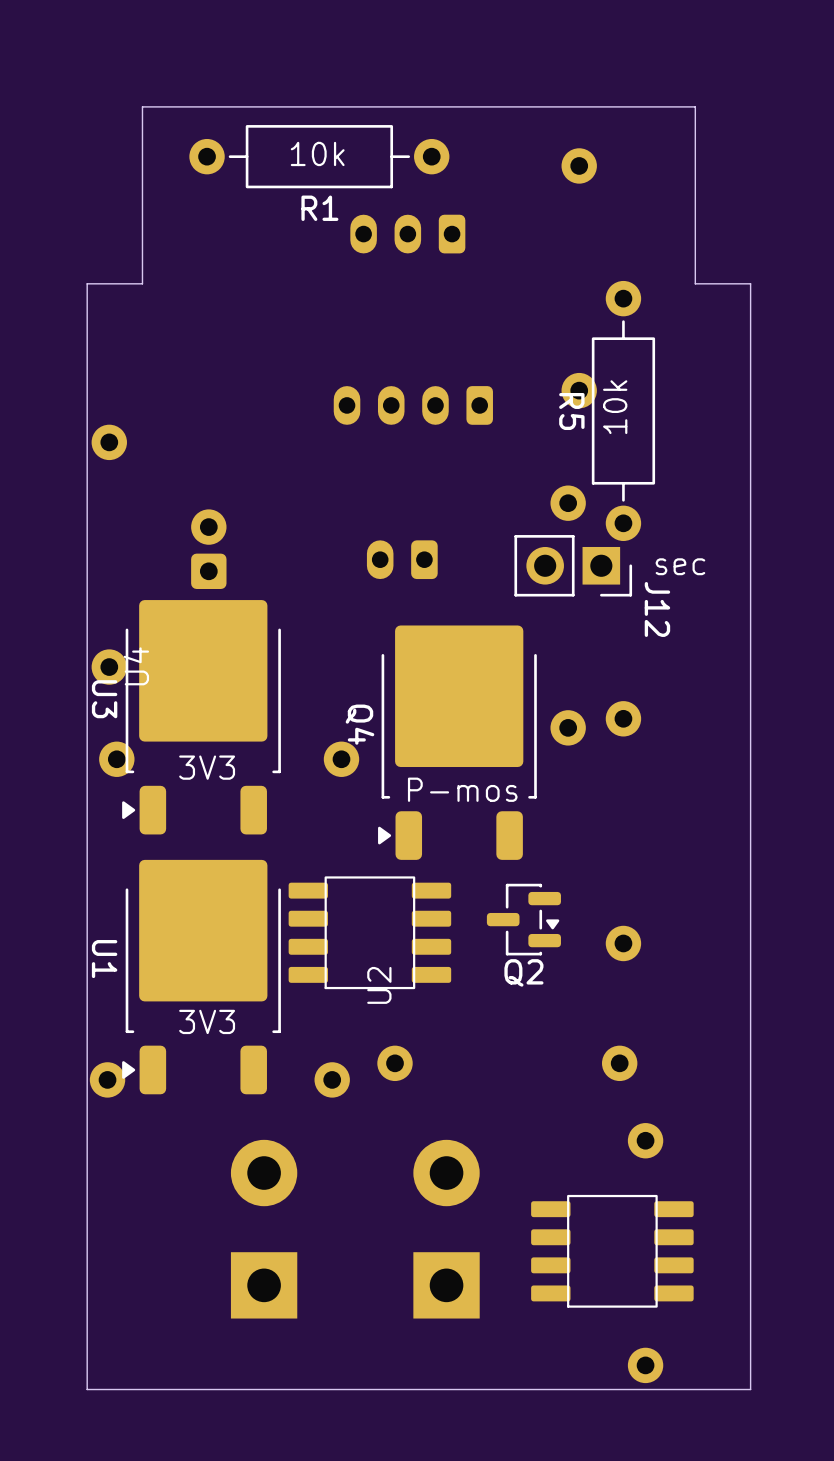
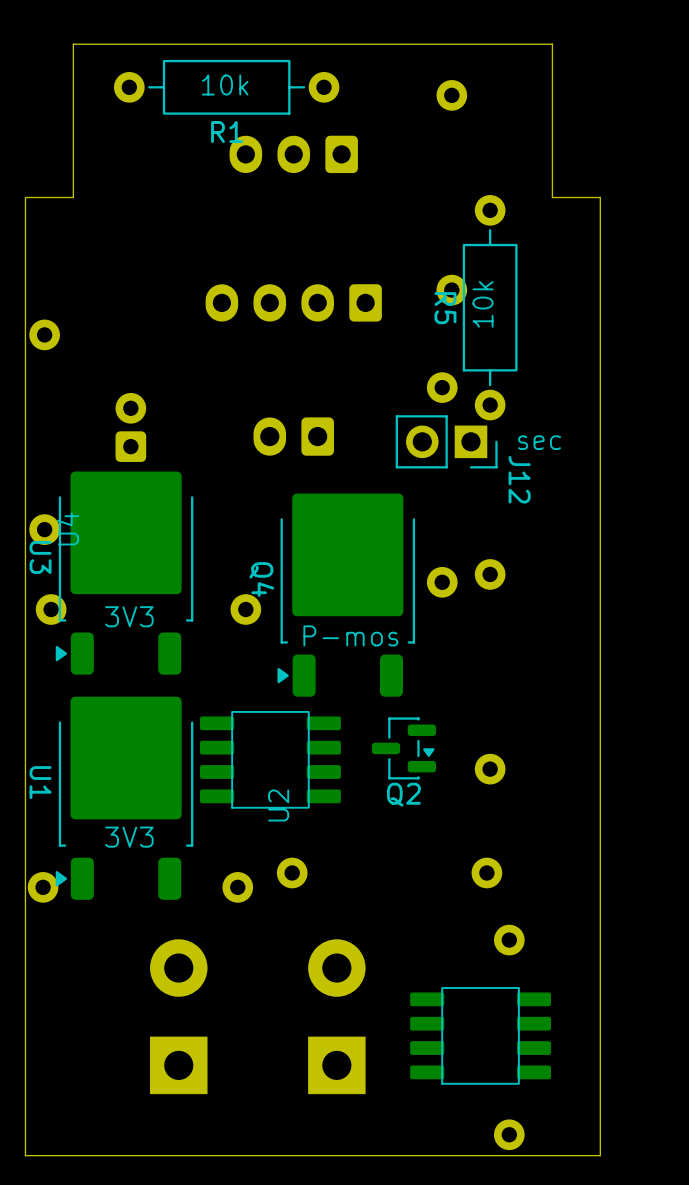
part footprint: [350, 214, 466, 254] -> [229, 135, 358, 174]
part footprint: [333, 386, 493, 425] -> [205, 284, 382, 322]
part footprint: [366, 540, 438, 580] -> [253, 417, 334, 456]

